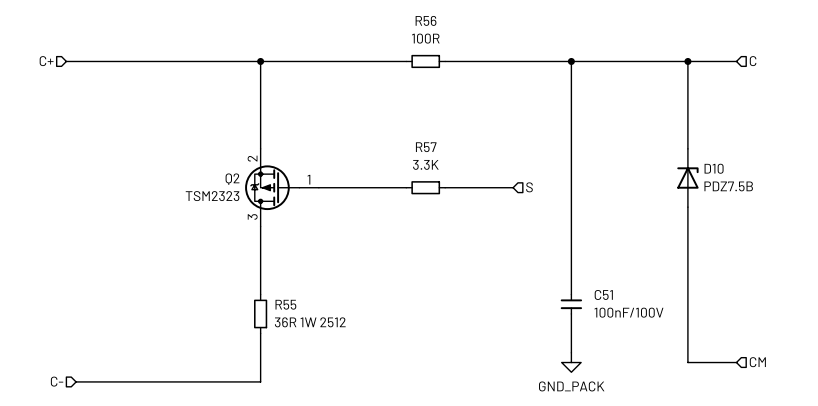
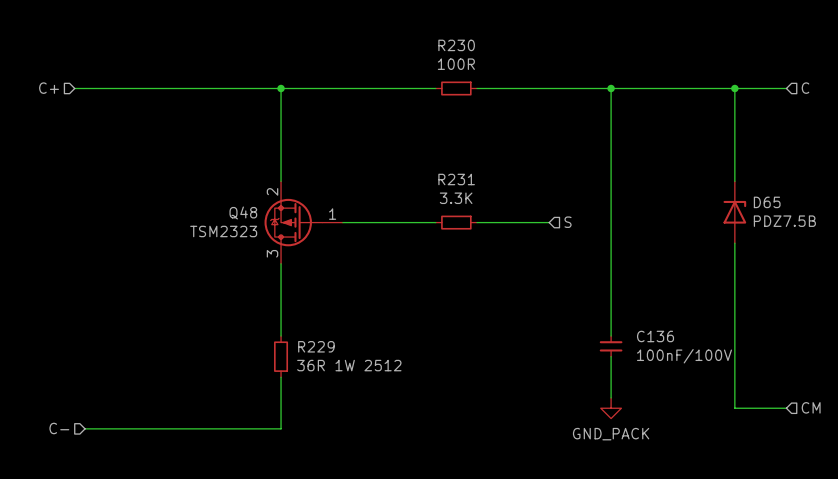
R56 name: R56 (426, 20) -> R230 (456, 45)
R57 name: R57 (426, 147) -> R231 (456, 179)
D10 name: D10 (714, 168) -> D65 (767, 202)
Q2 name: Q2 (232, 179) -> Q48 (243, 212)
C51 name: C51 (603, 294) -> C136 (655, 336)
R55 name: R55 (285, 304) -> R229 (316, 346)

